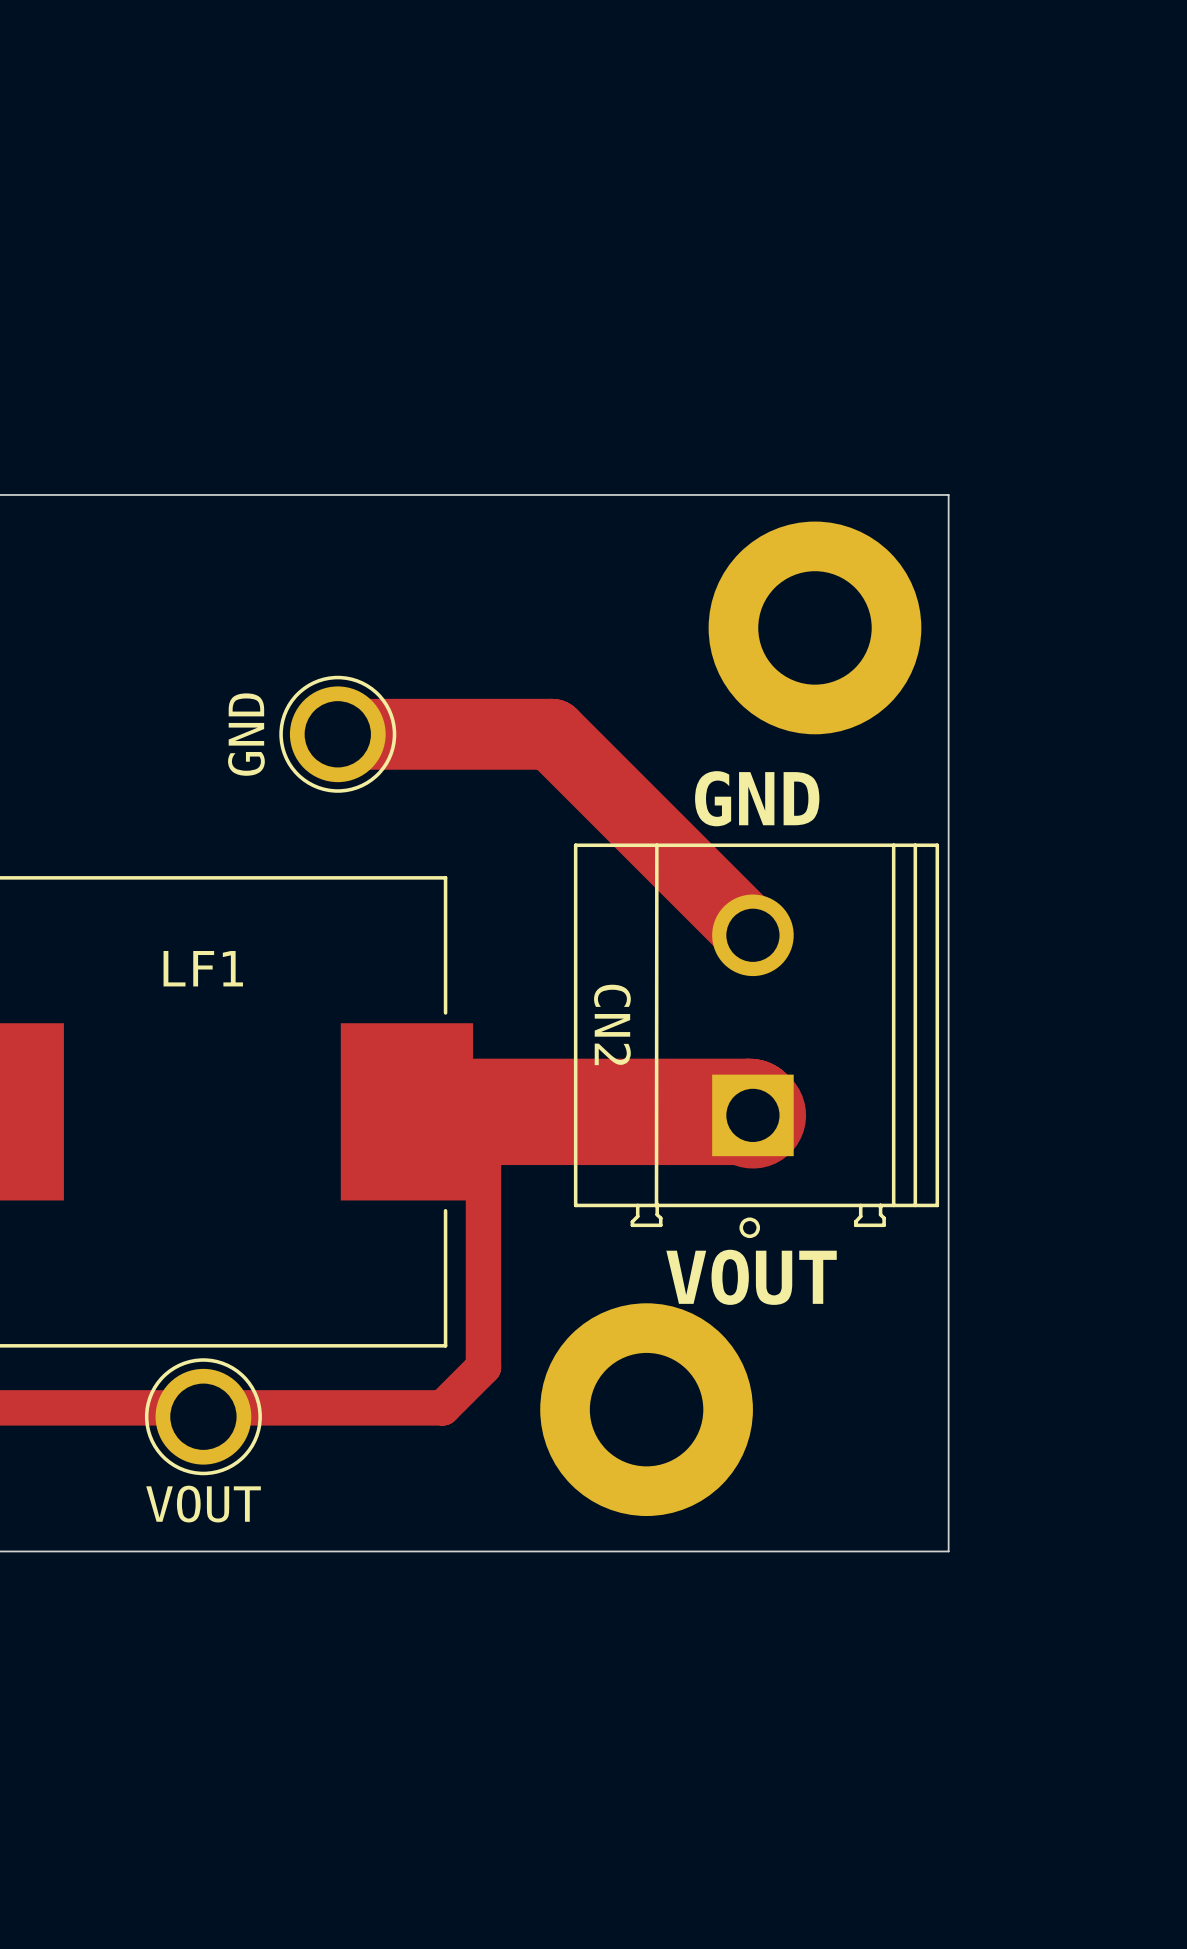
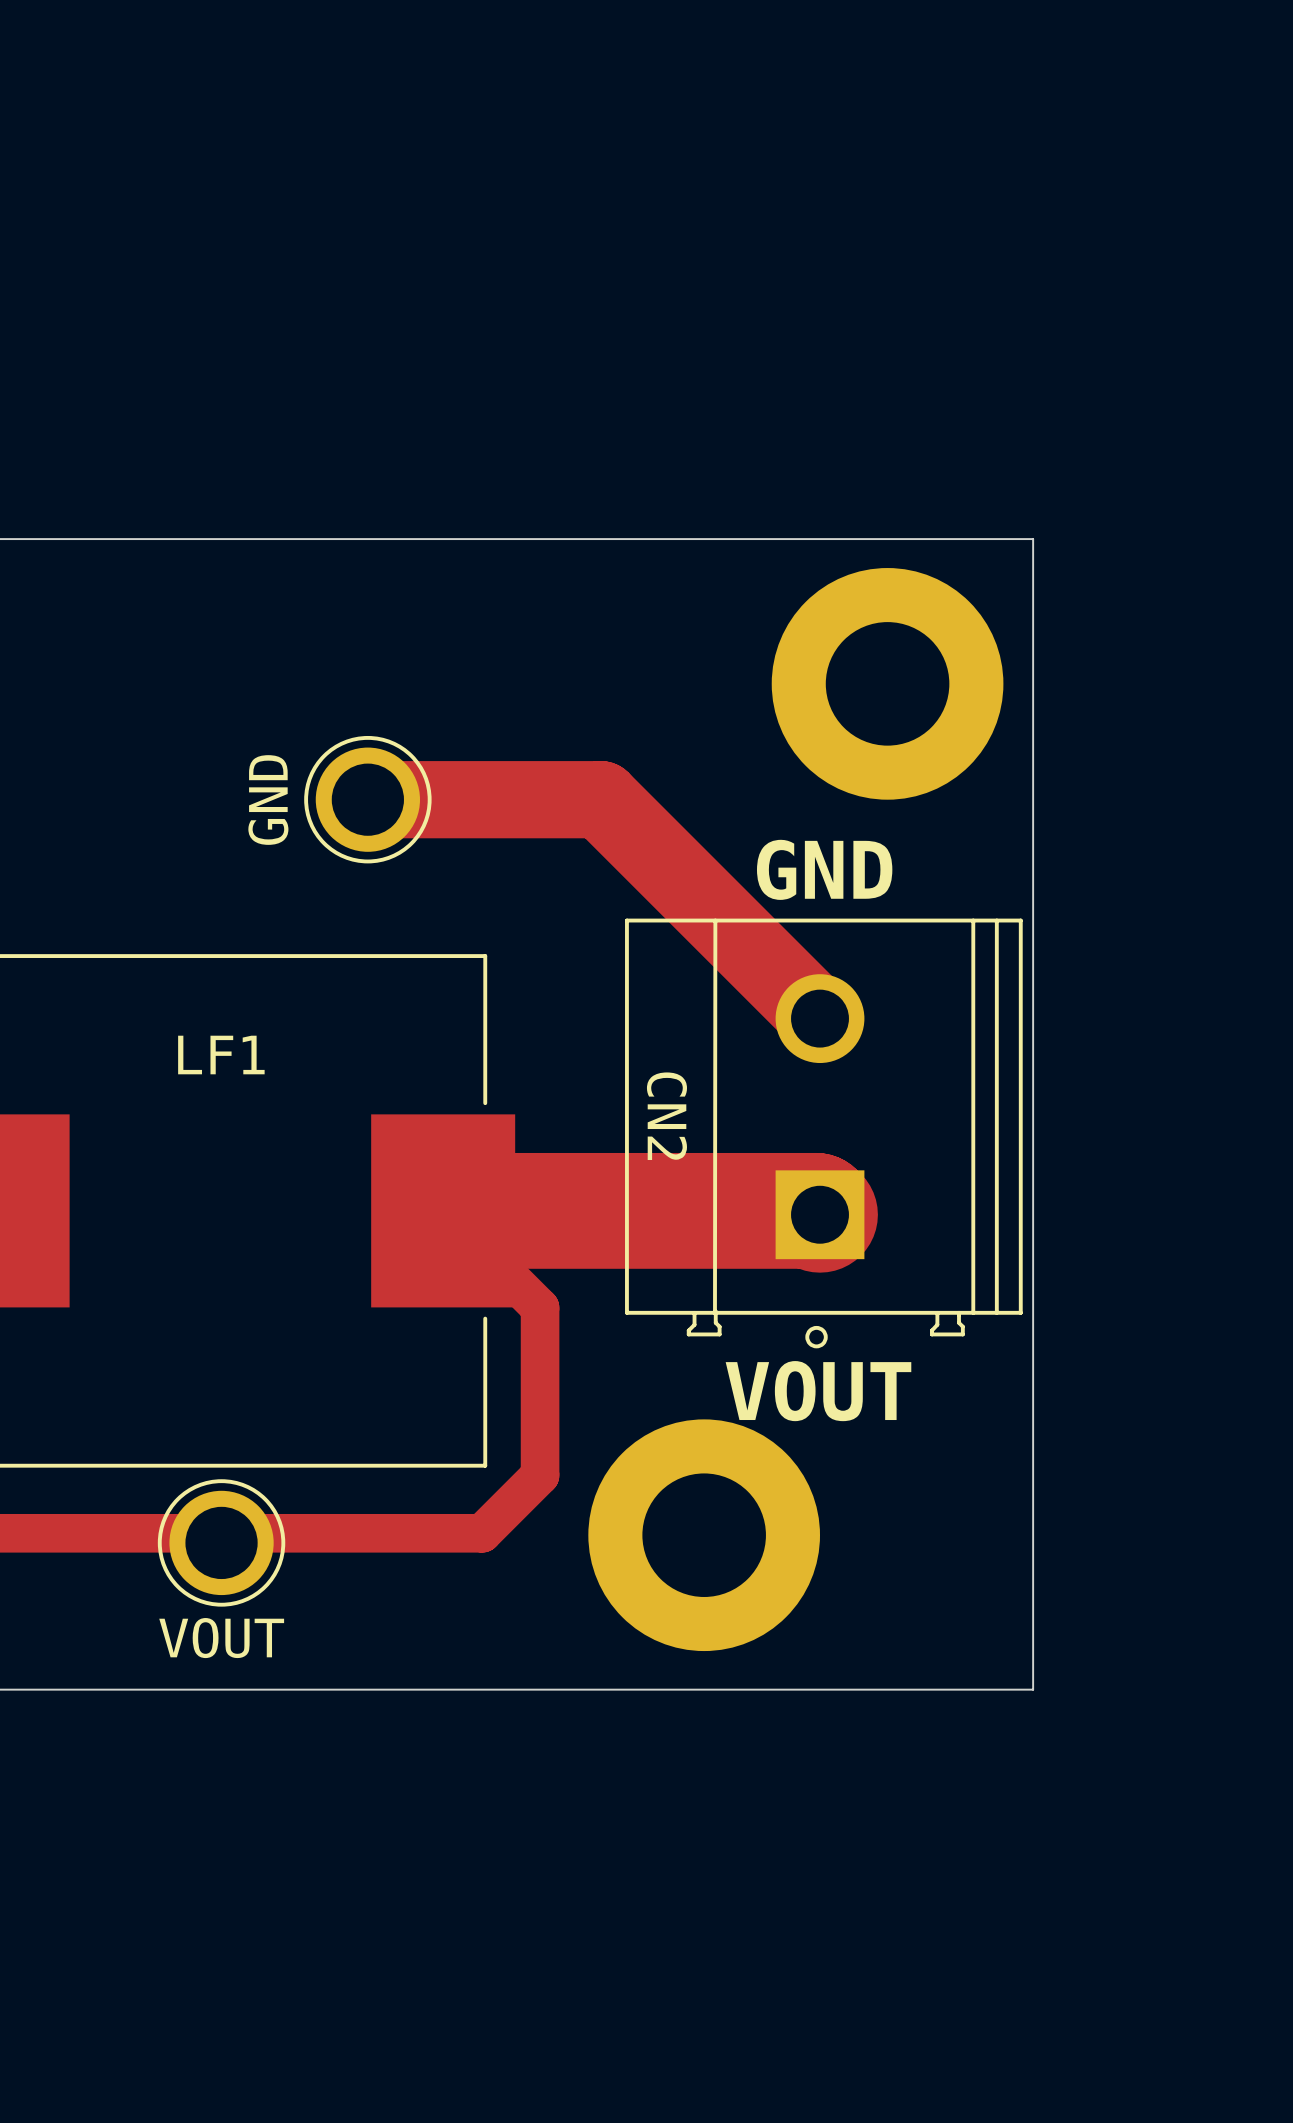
top track: (406, 1111) (456, 1111) (483, 1138) (483, 1367) -> (443, 1210) (540, 1307) (540, 1475) (526, 1488)

